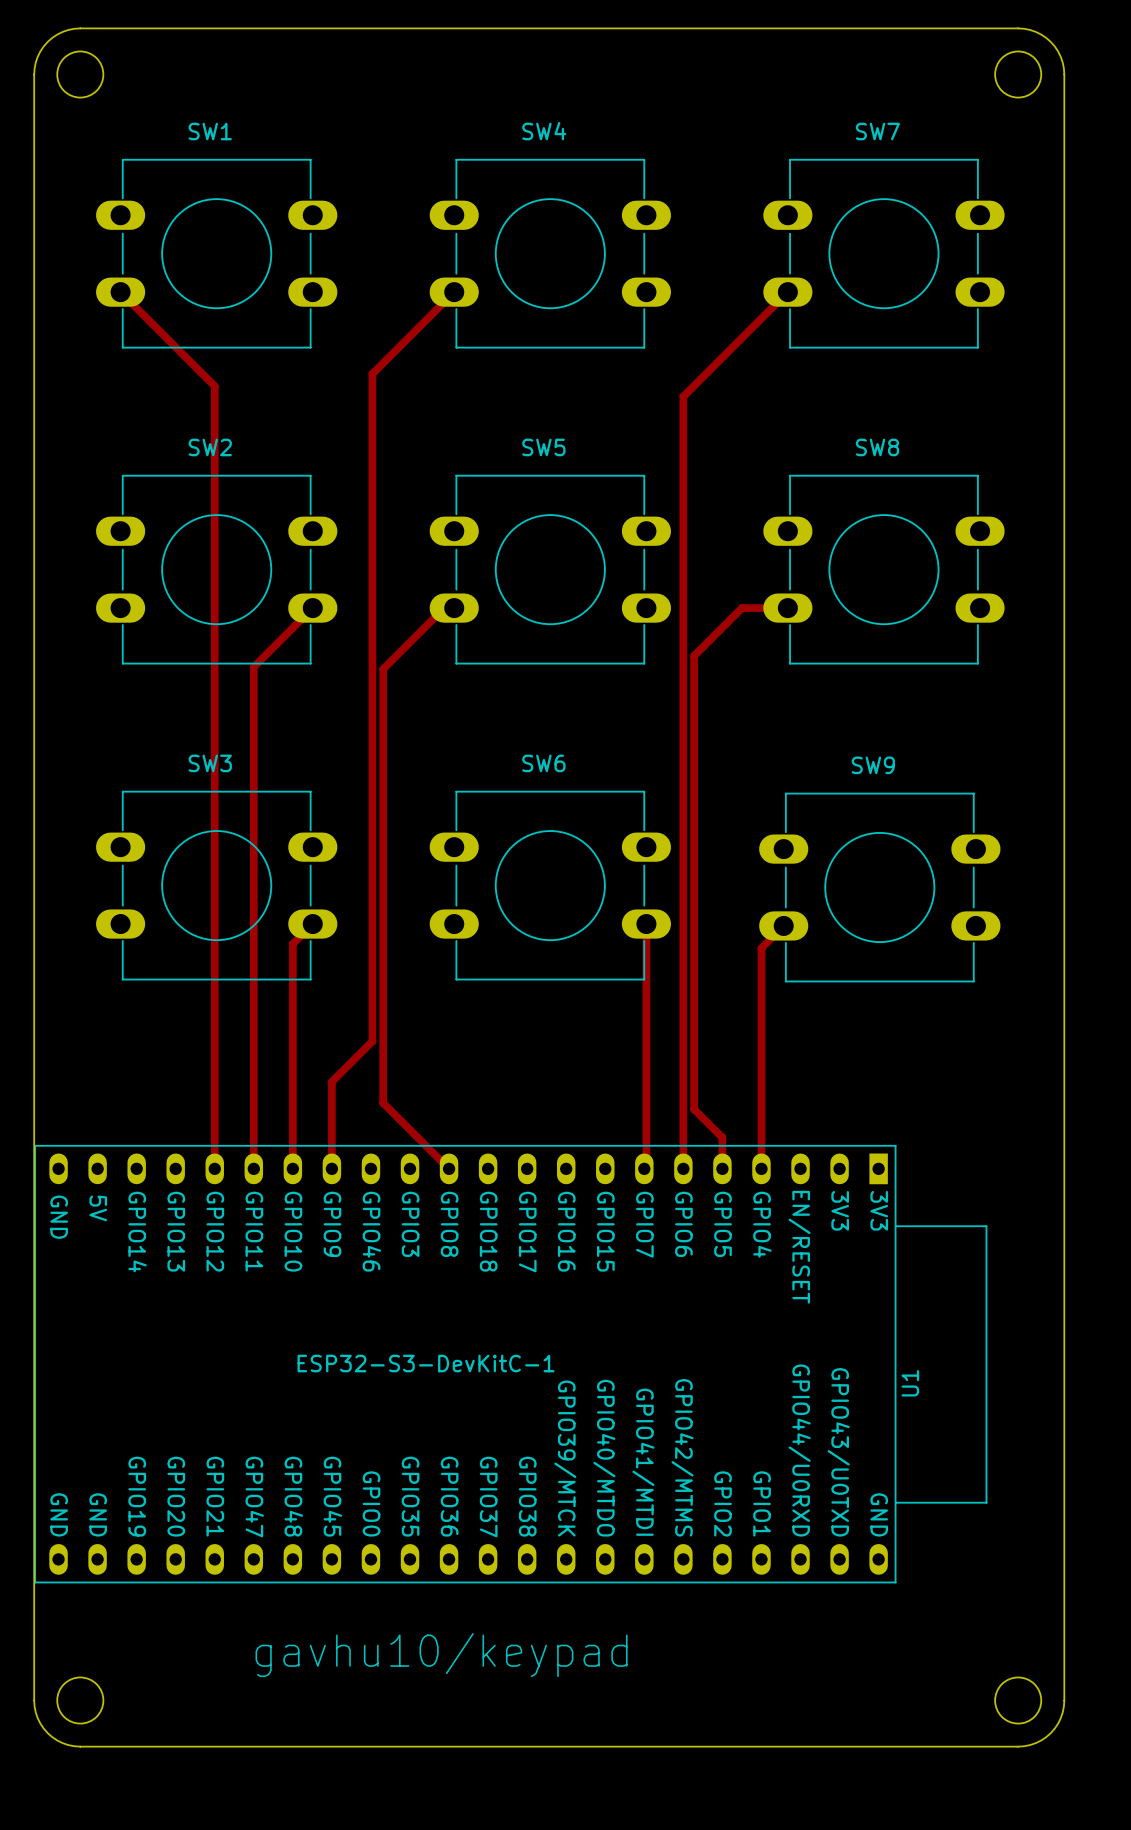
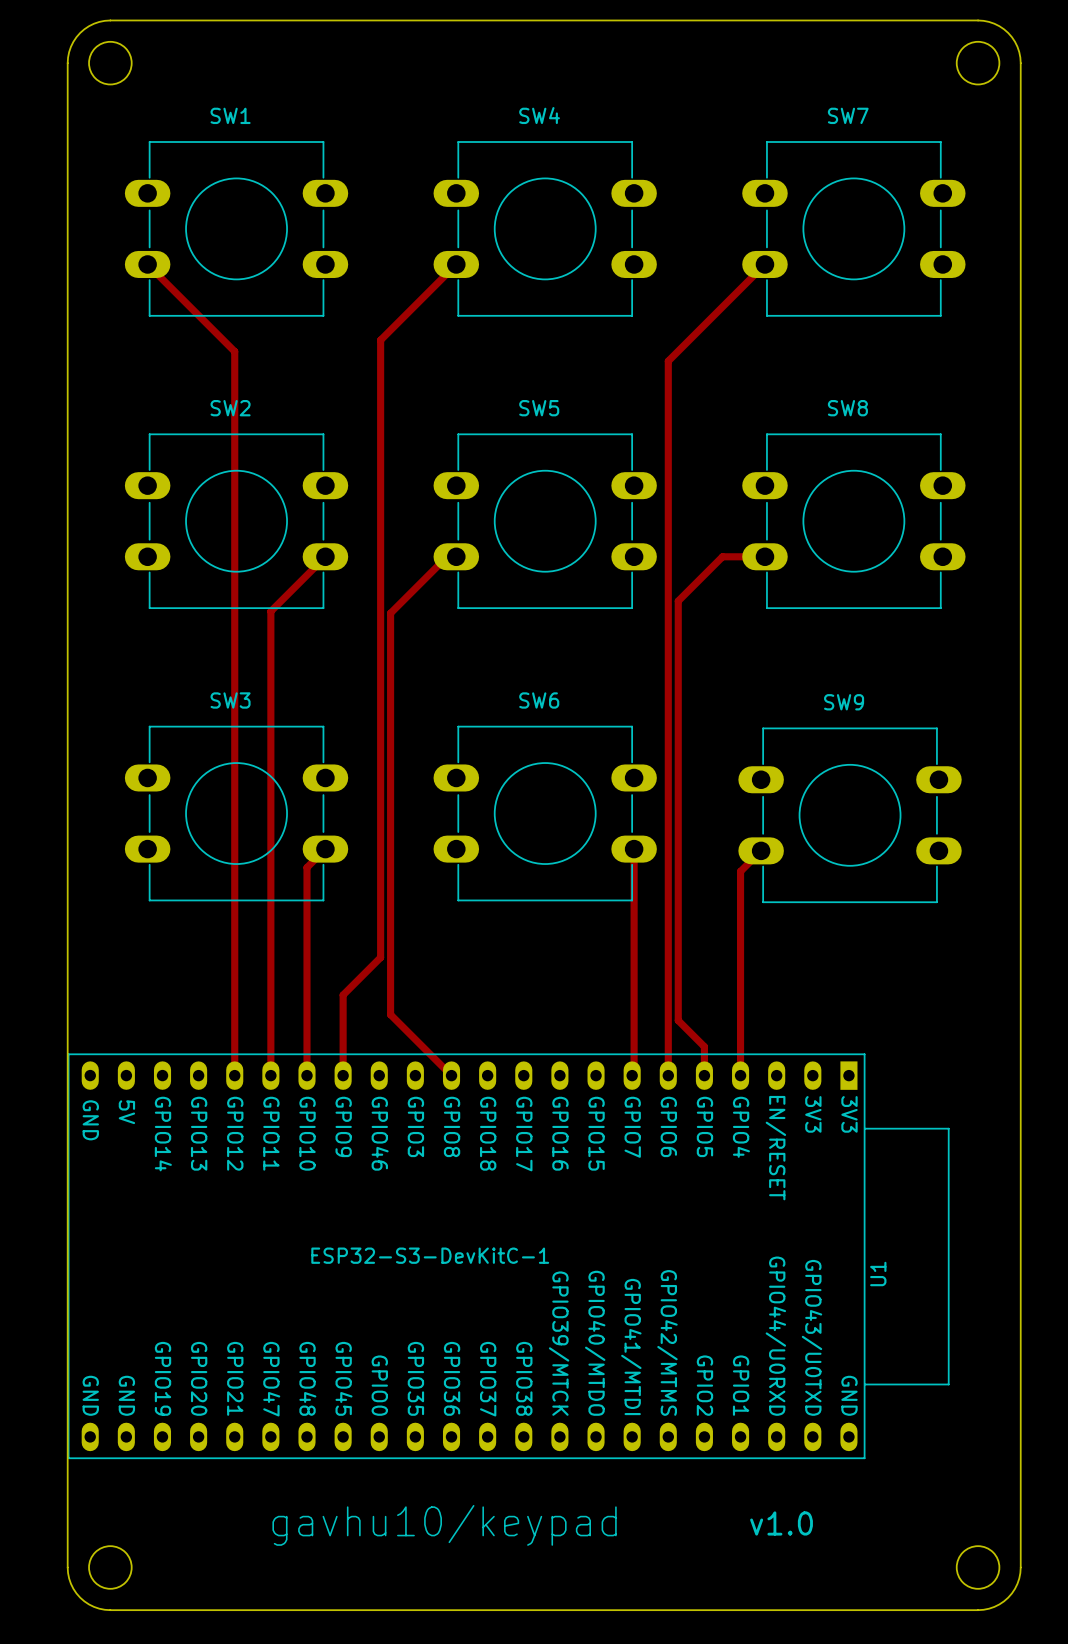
text: none -> v1.0 (781, 1523)

